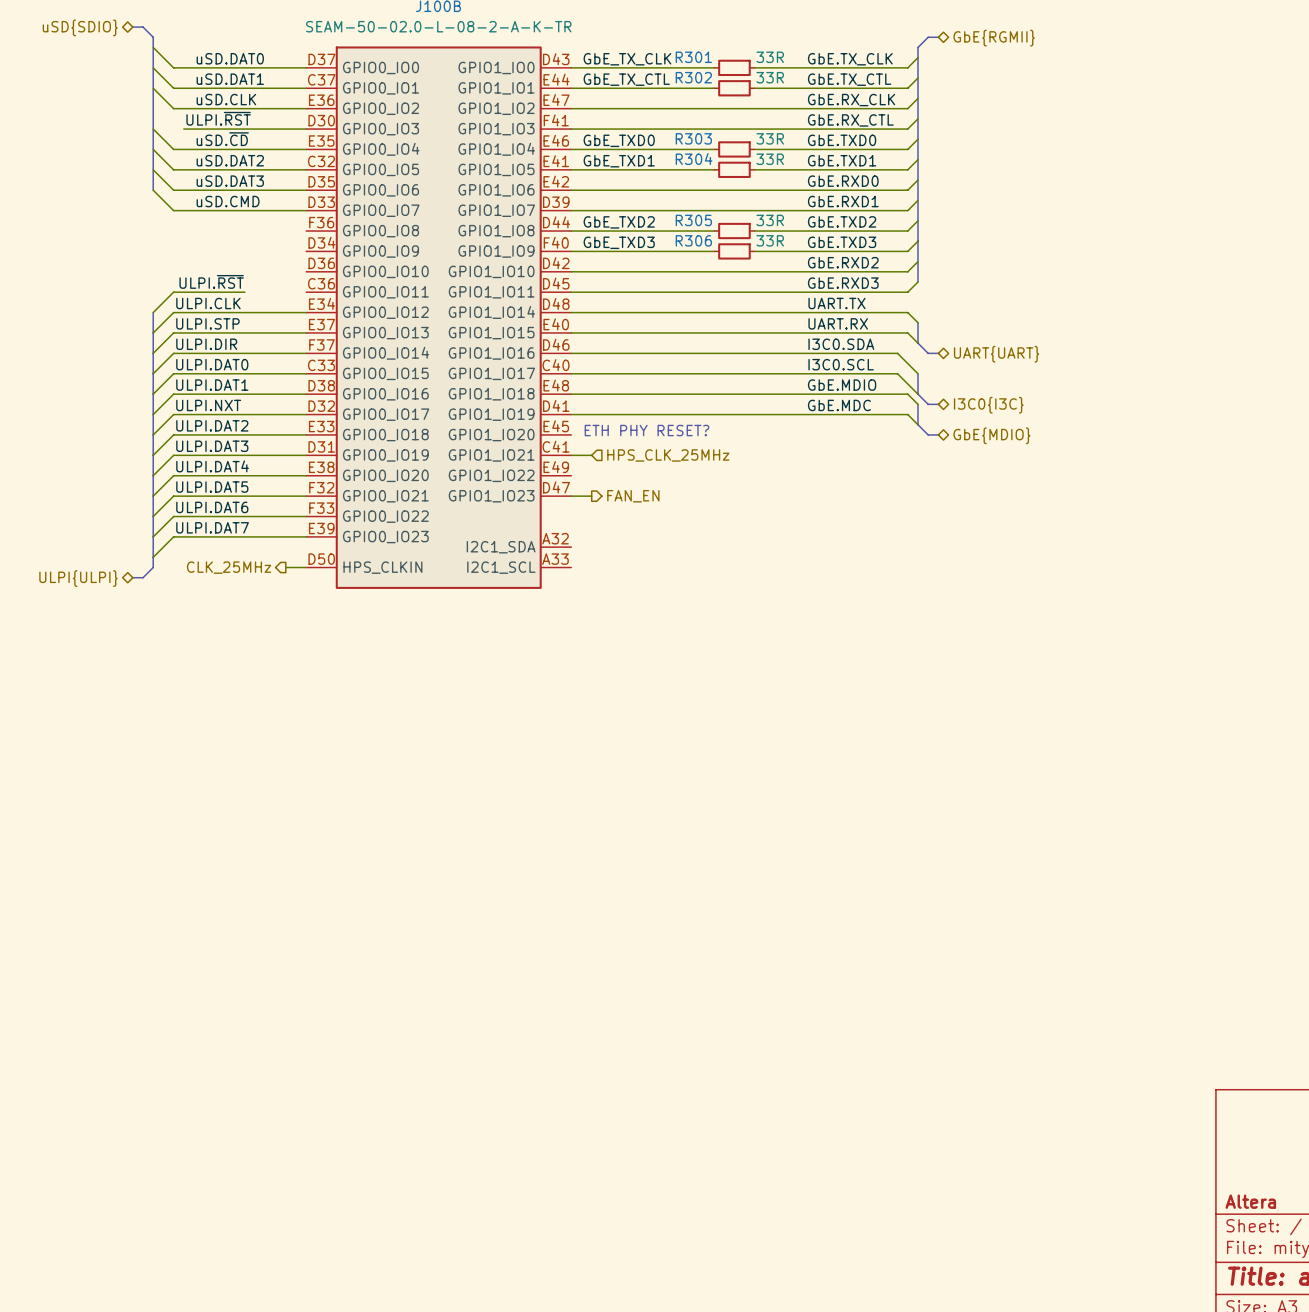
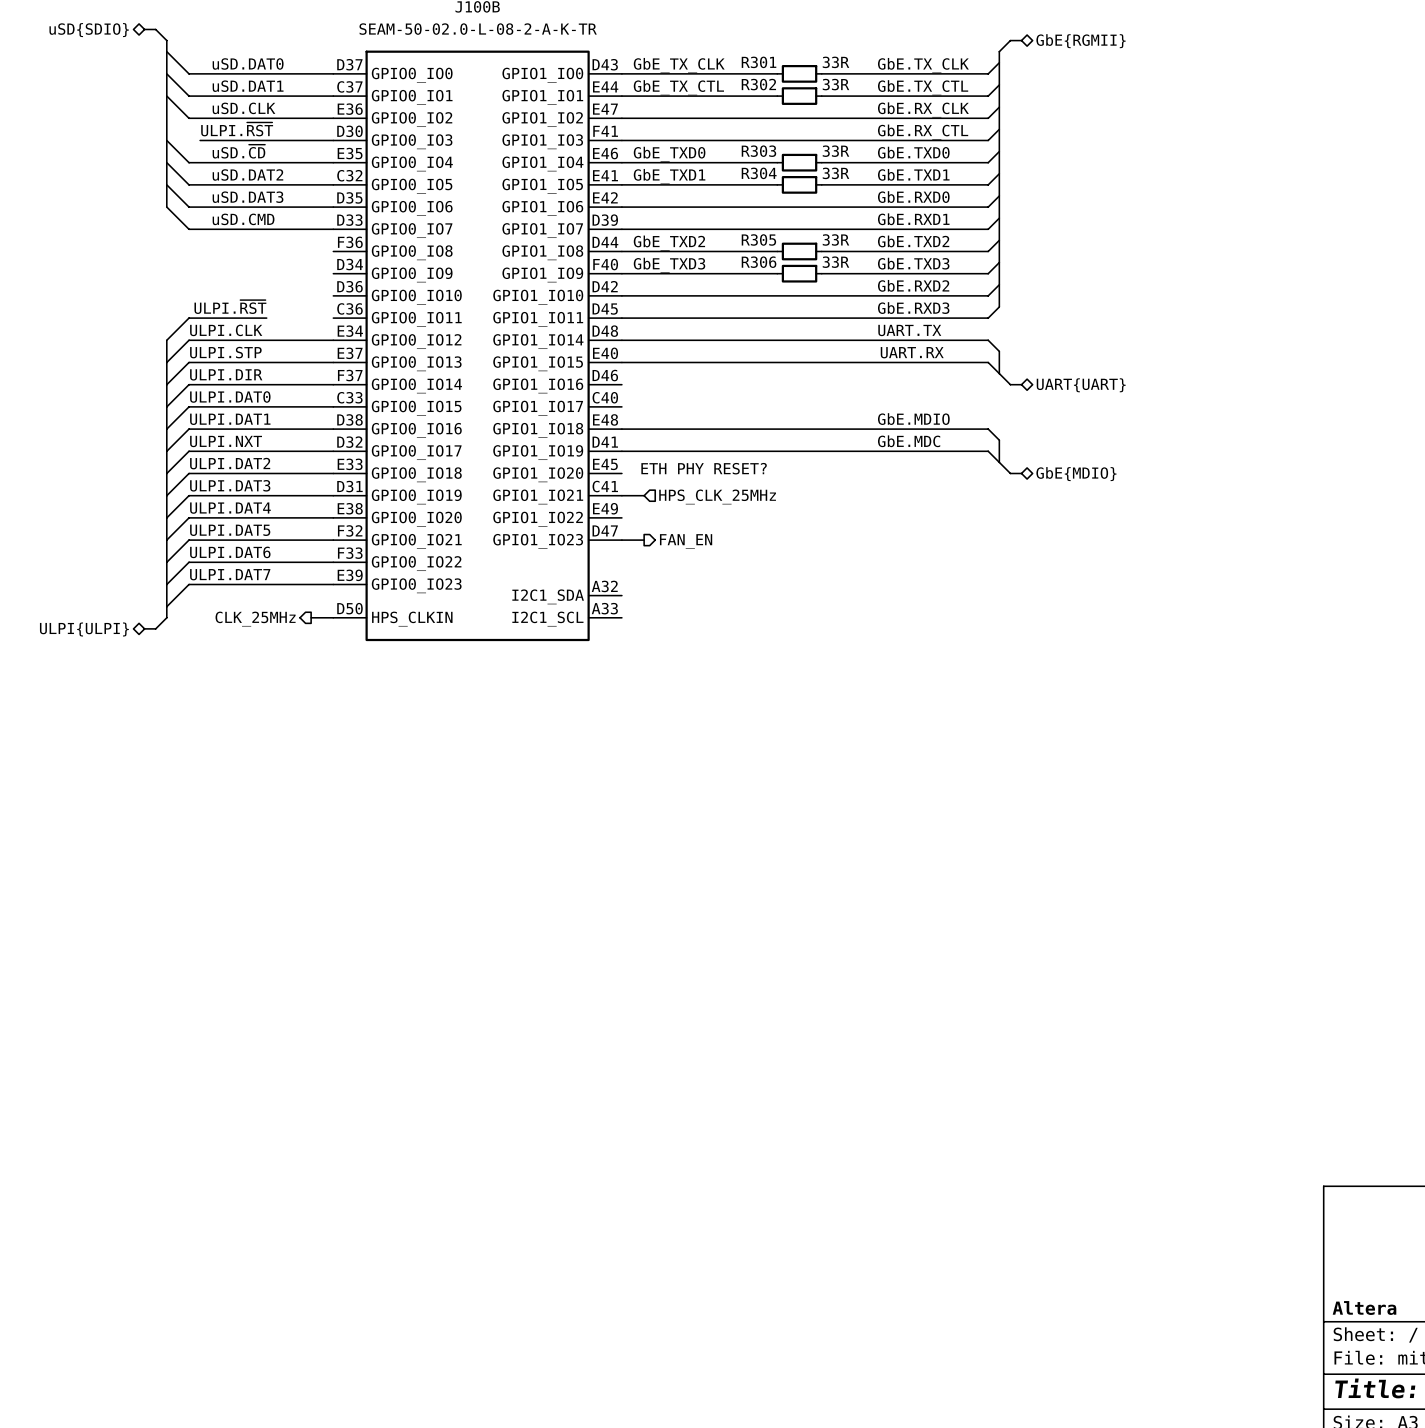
label position: UART.RX (838, 323) -> UART.RX (912, 352)
label: I3C0.SDA (841, 344) -> none
wire: (571, 353) (897, 353) (917, 373) -> none
label: I3C0.SCL (841, 364) -> none
wire: (571, 373) (897, 373) (917, 394) -> none
bus: (917, 373) (917, 394) (928, 404) (938, 404) -> none
hierarchical label: I3C0{I3C} (988, 405) -> none

